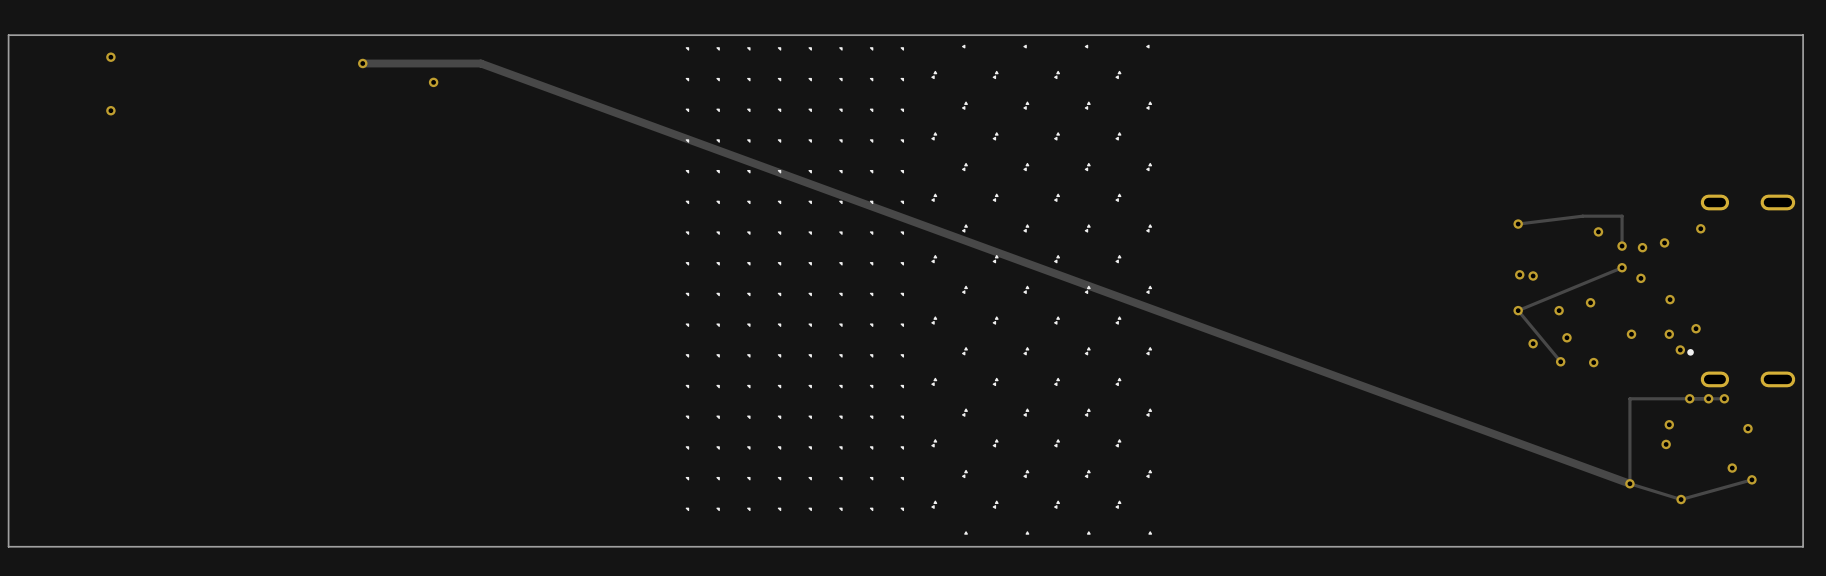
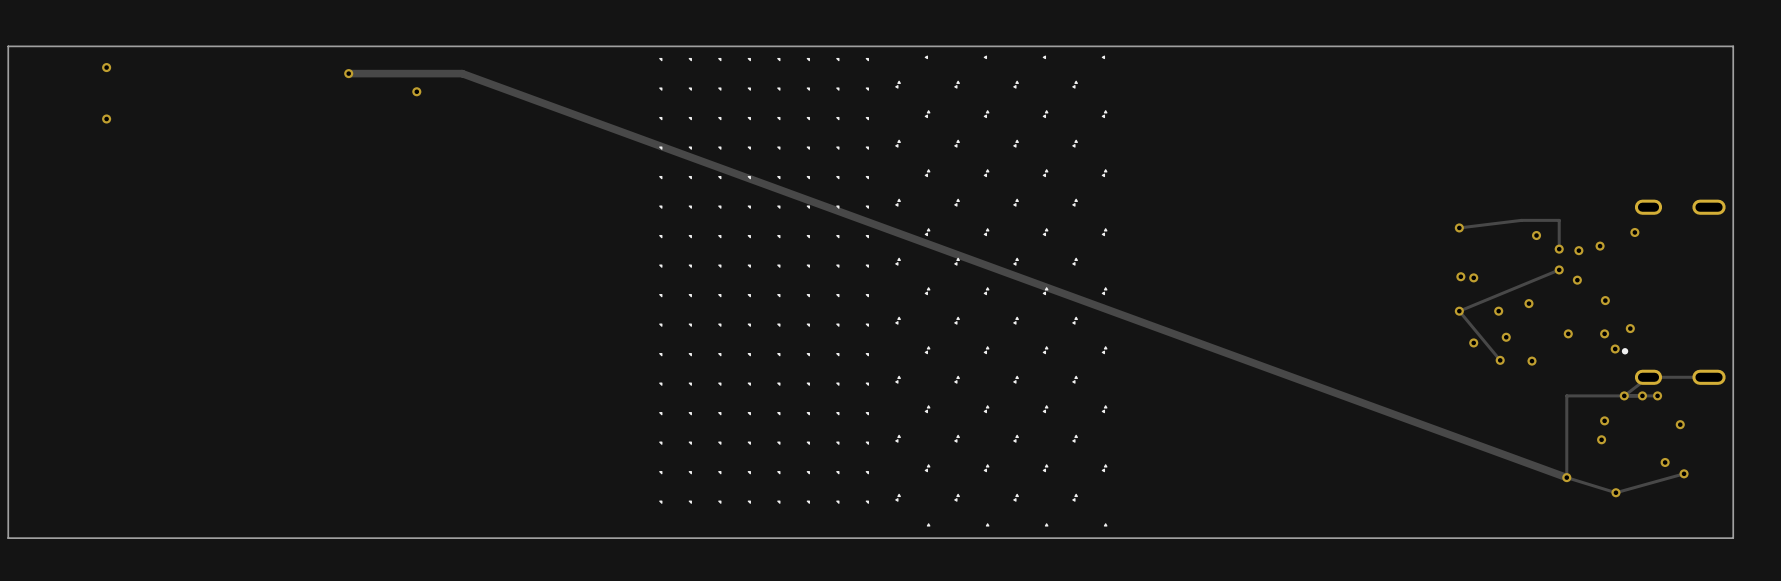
track: none -> (1709, 377) (1648, 377) (1624, 395)

